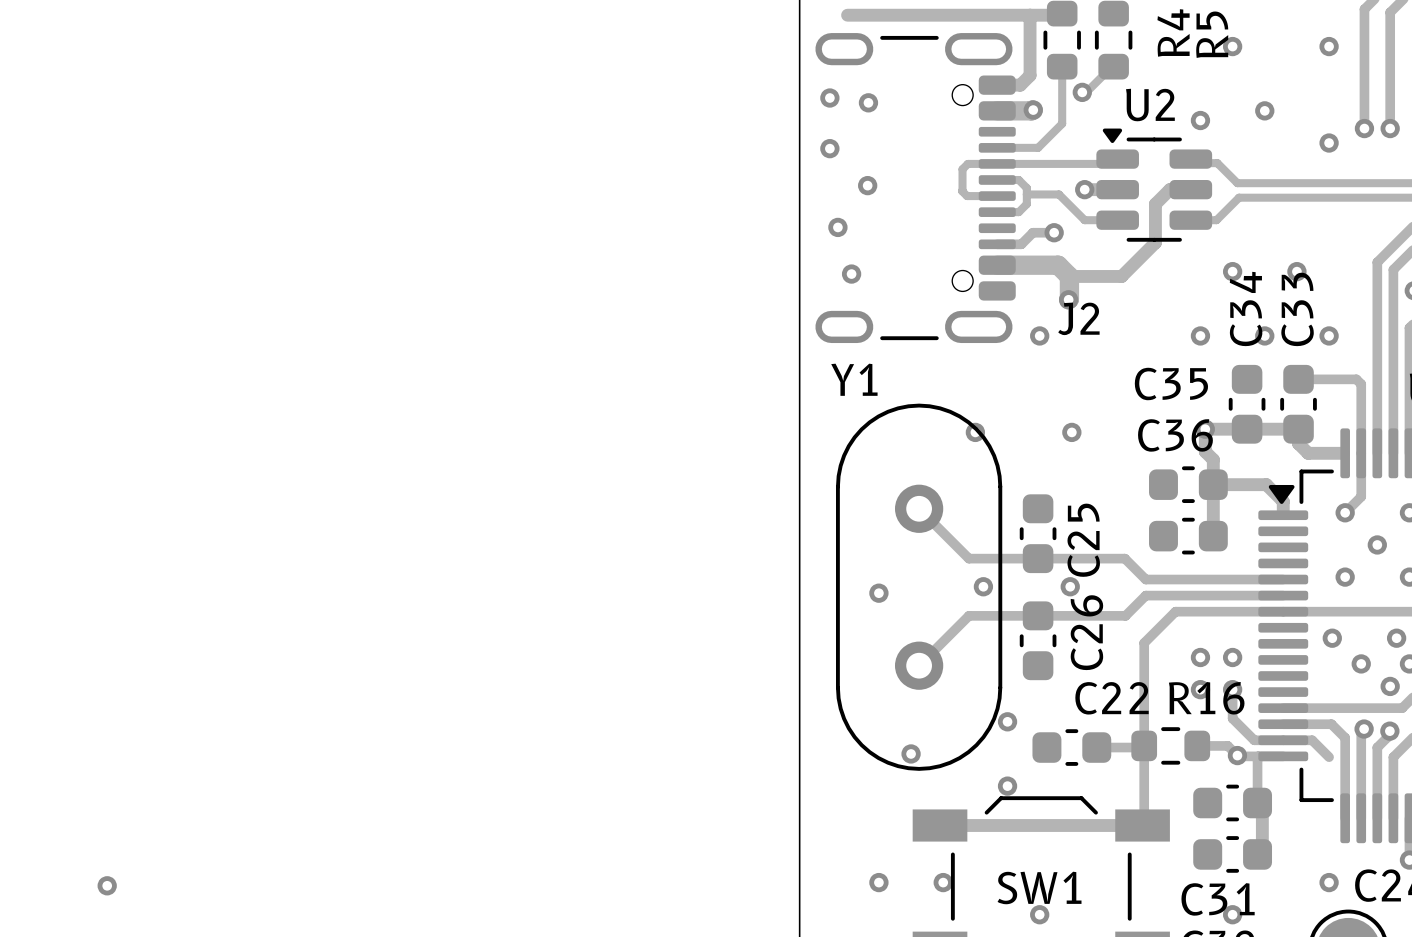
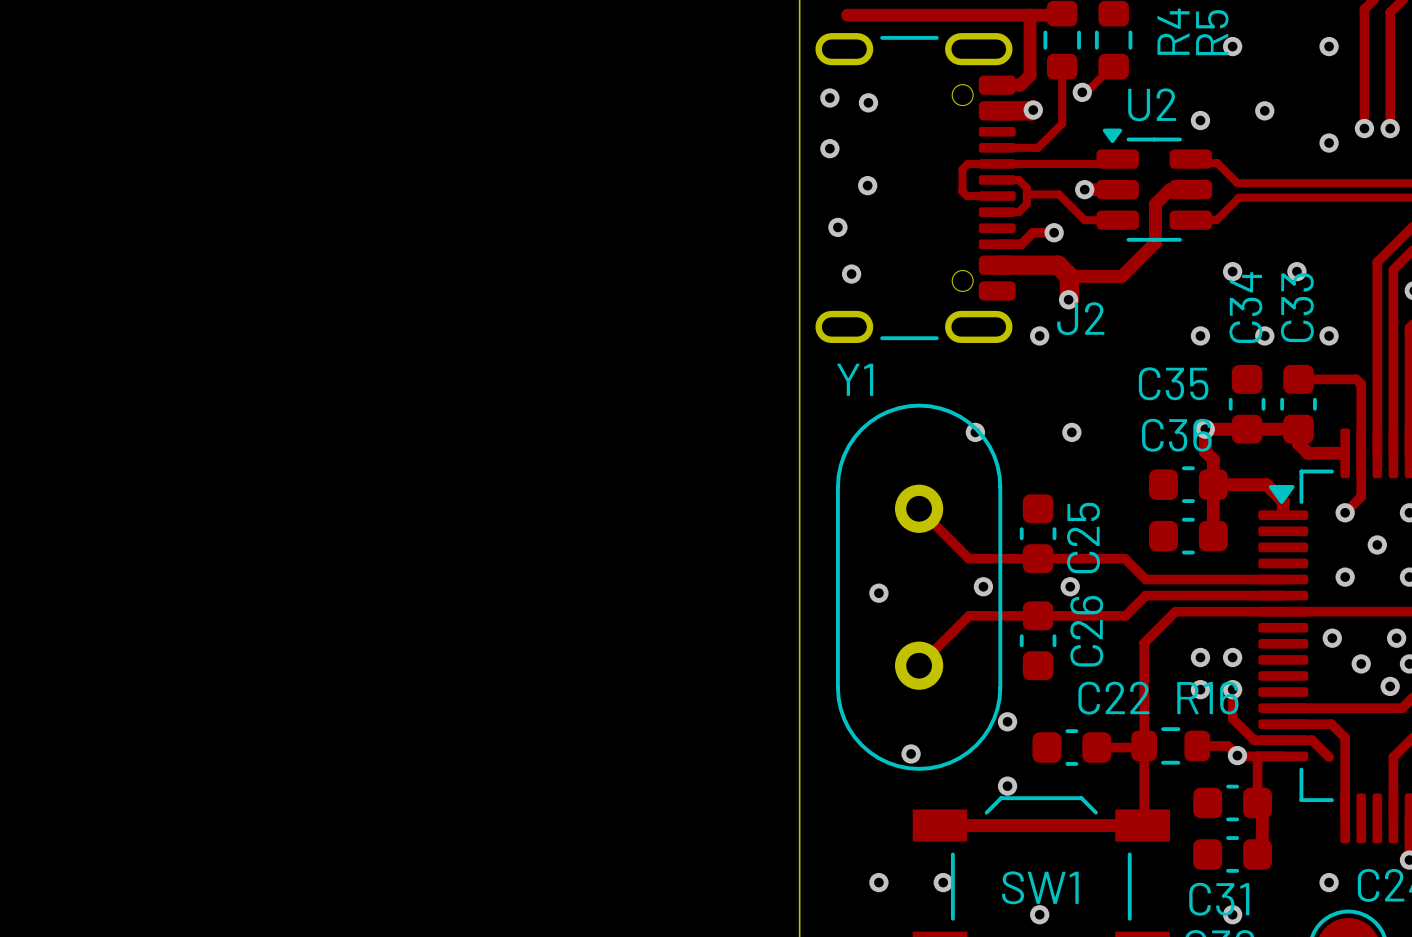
track: (1364, 729) (1361, 729) (1361, 818) -> none
via: (1364, 729) -> none
track: (1389, 731) (1389, 734) (1377, 747) (1377, 818) -> none
via: (1389, 731) -> none
via: (107, 885) -> none

